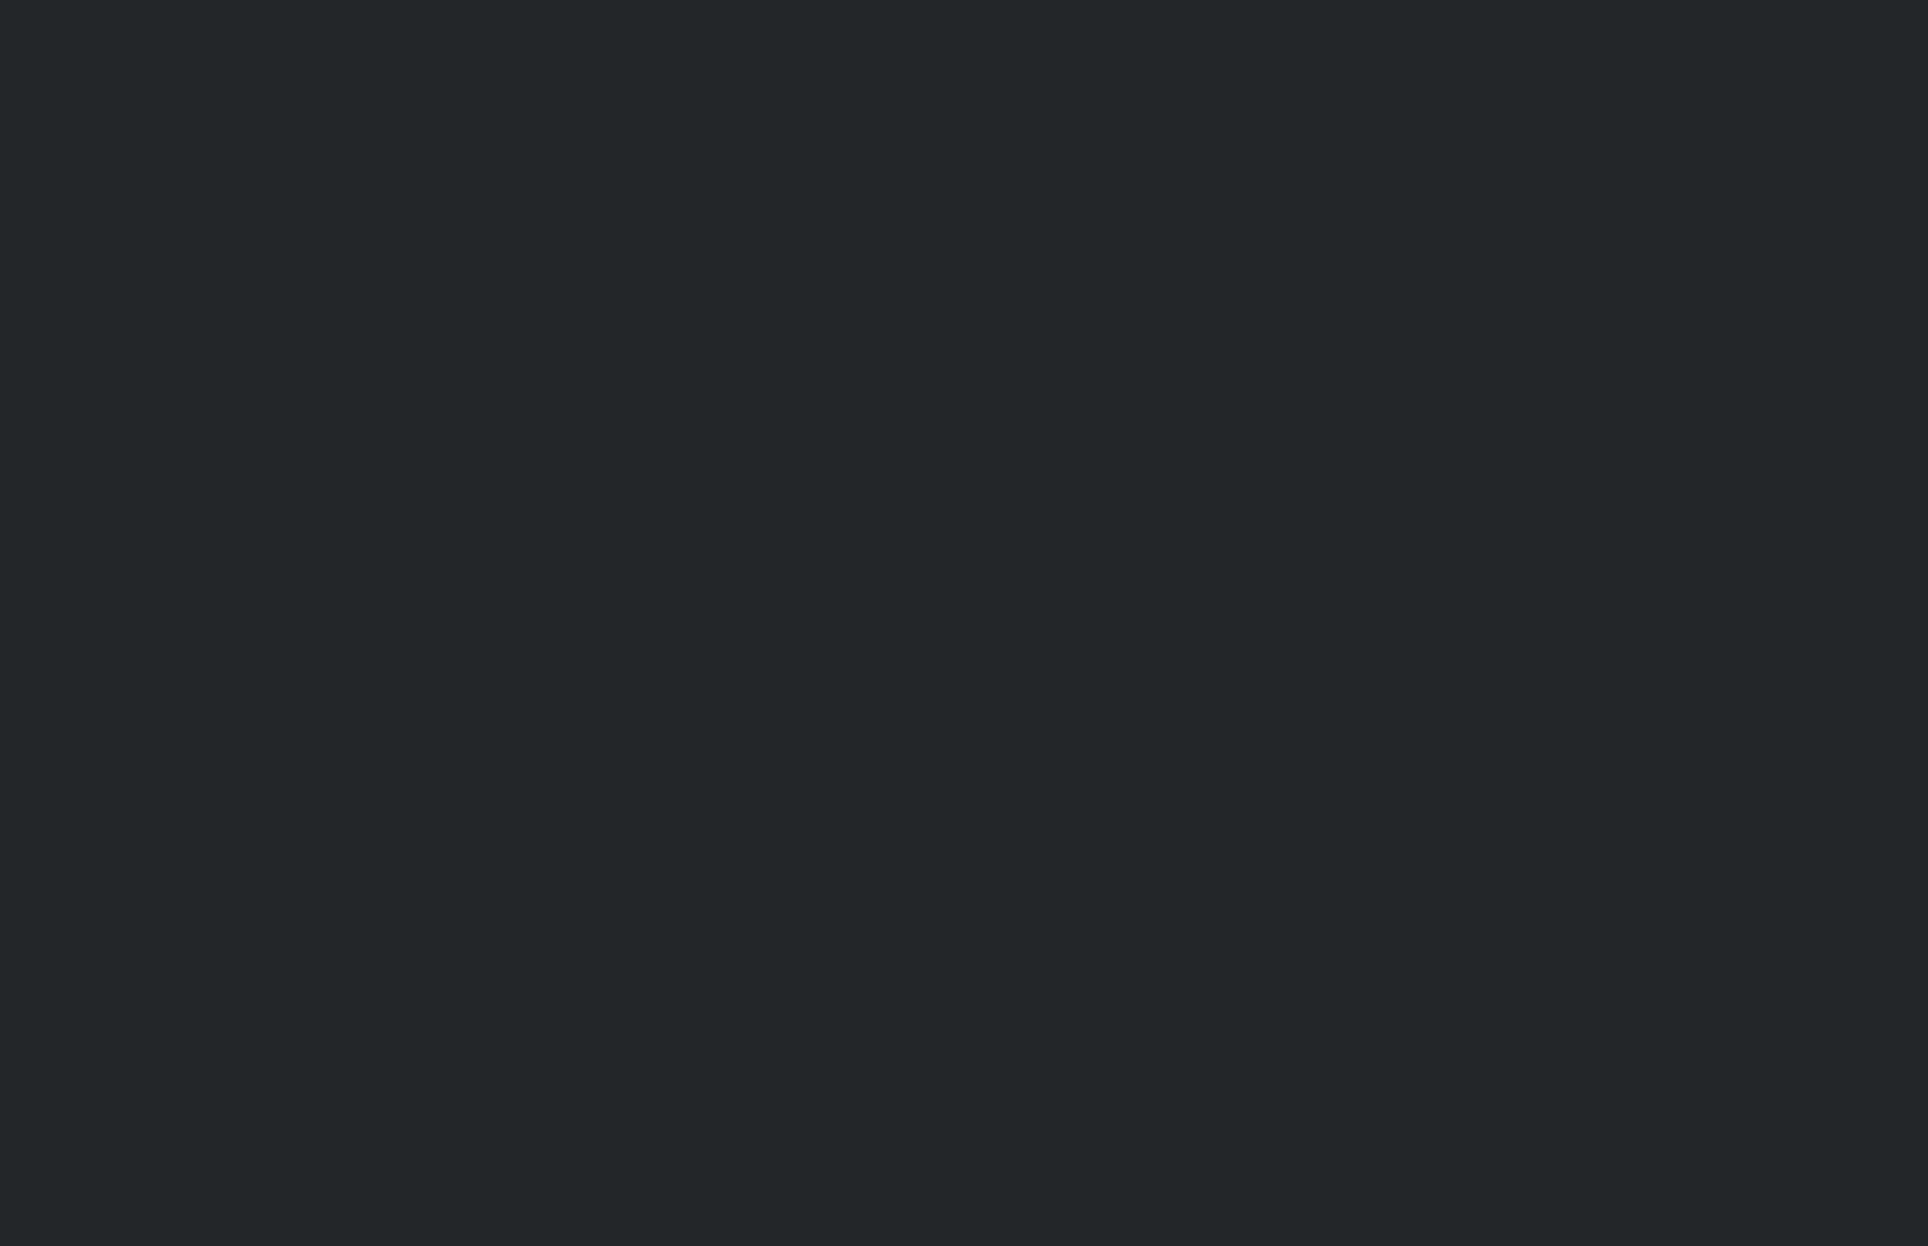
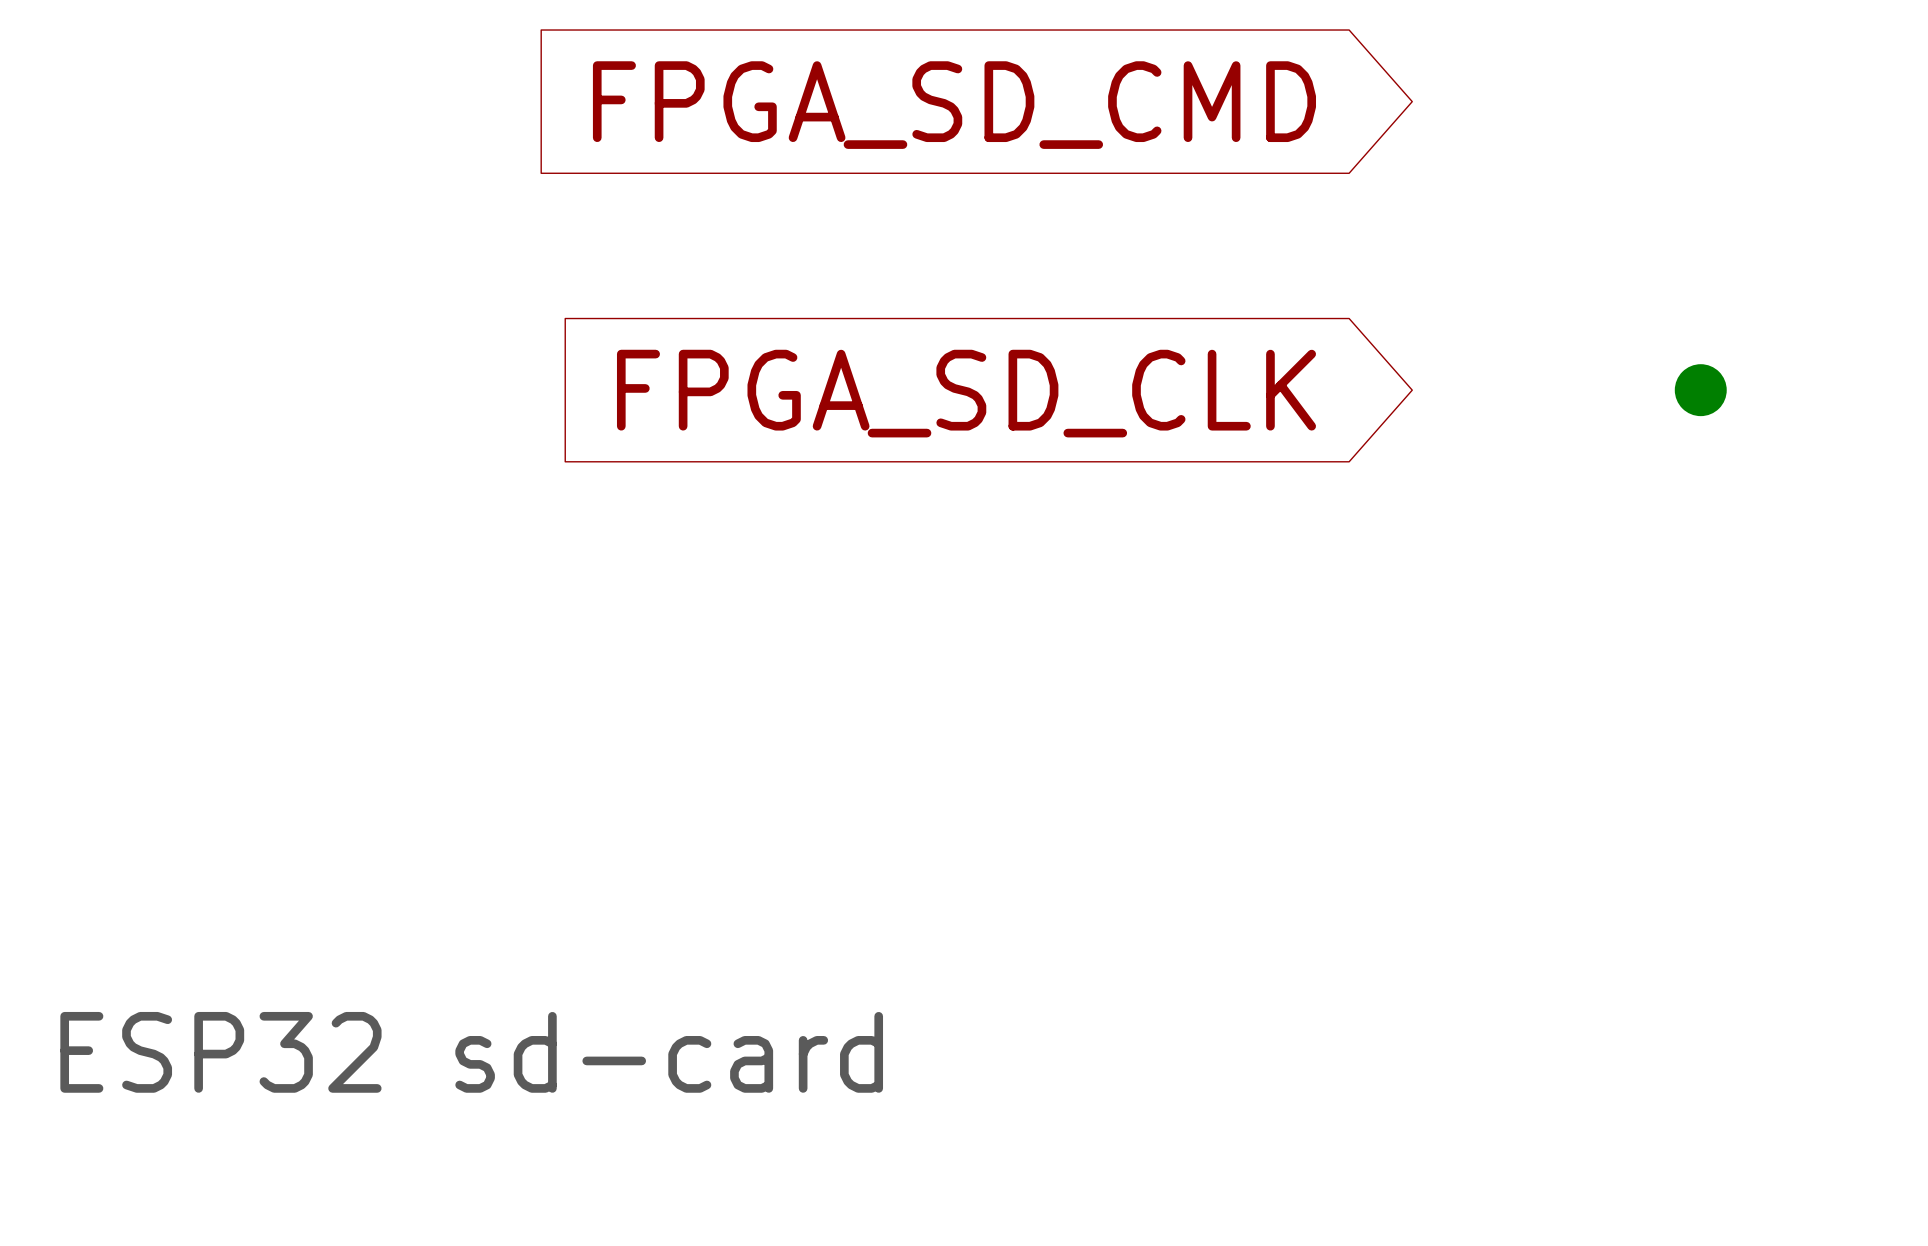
global label: none -> FPGA_SD_CMD (954, 105)
junction: none -> (1700, 390)
global label: none -> FPGA_SD_CLK (966, 393)
text: none -> ESP32 sd-card (471, 1052)

